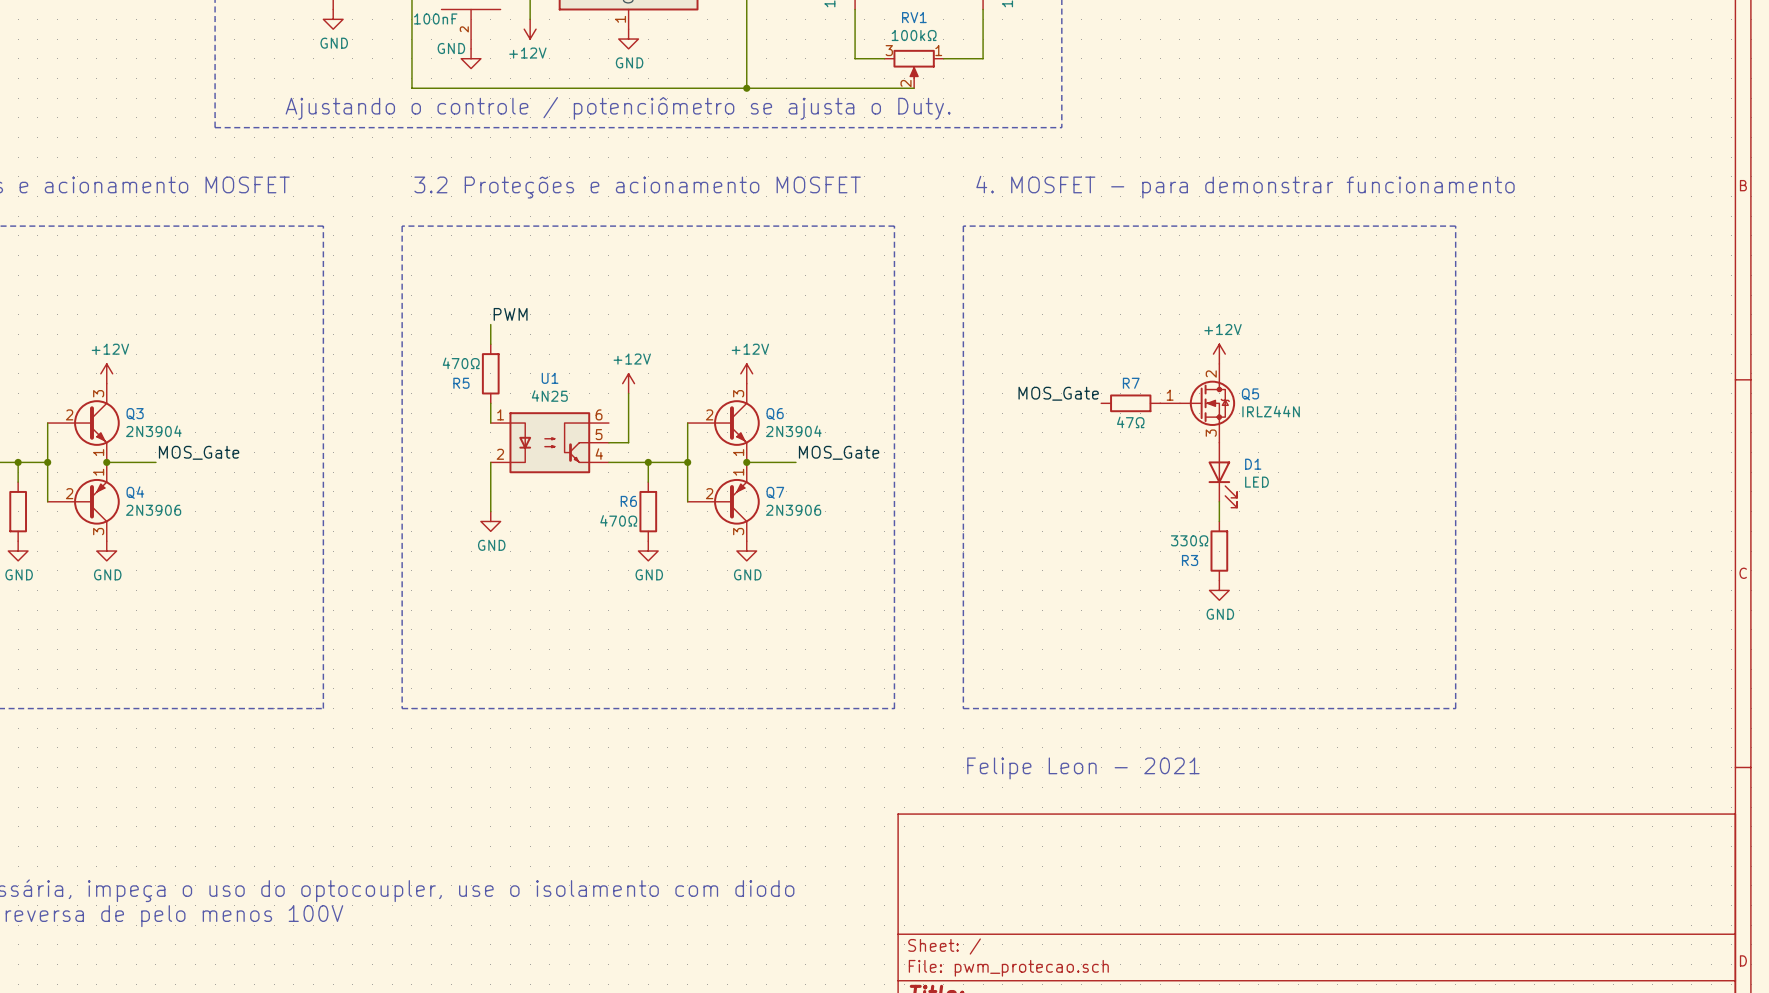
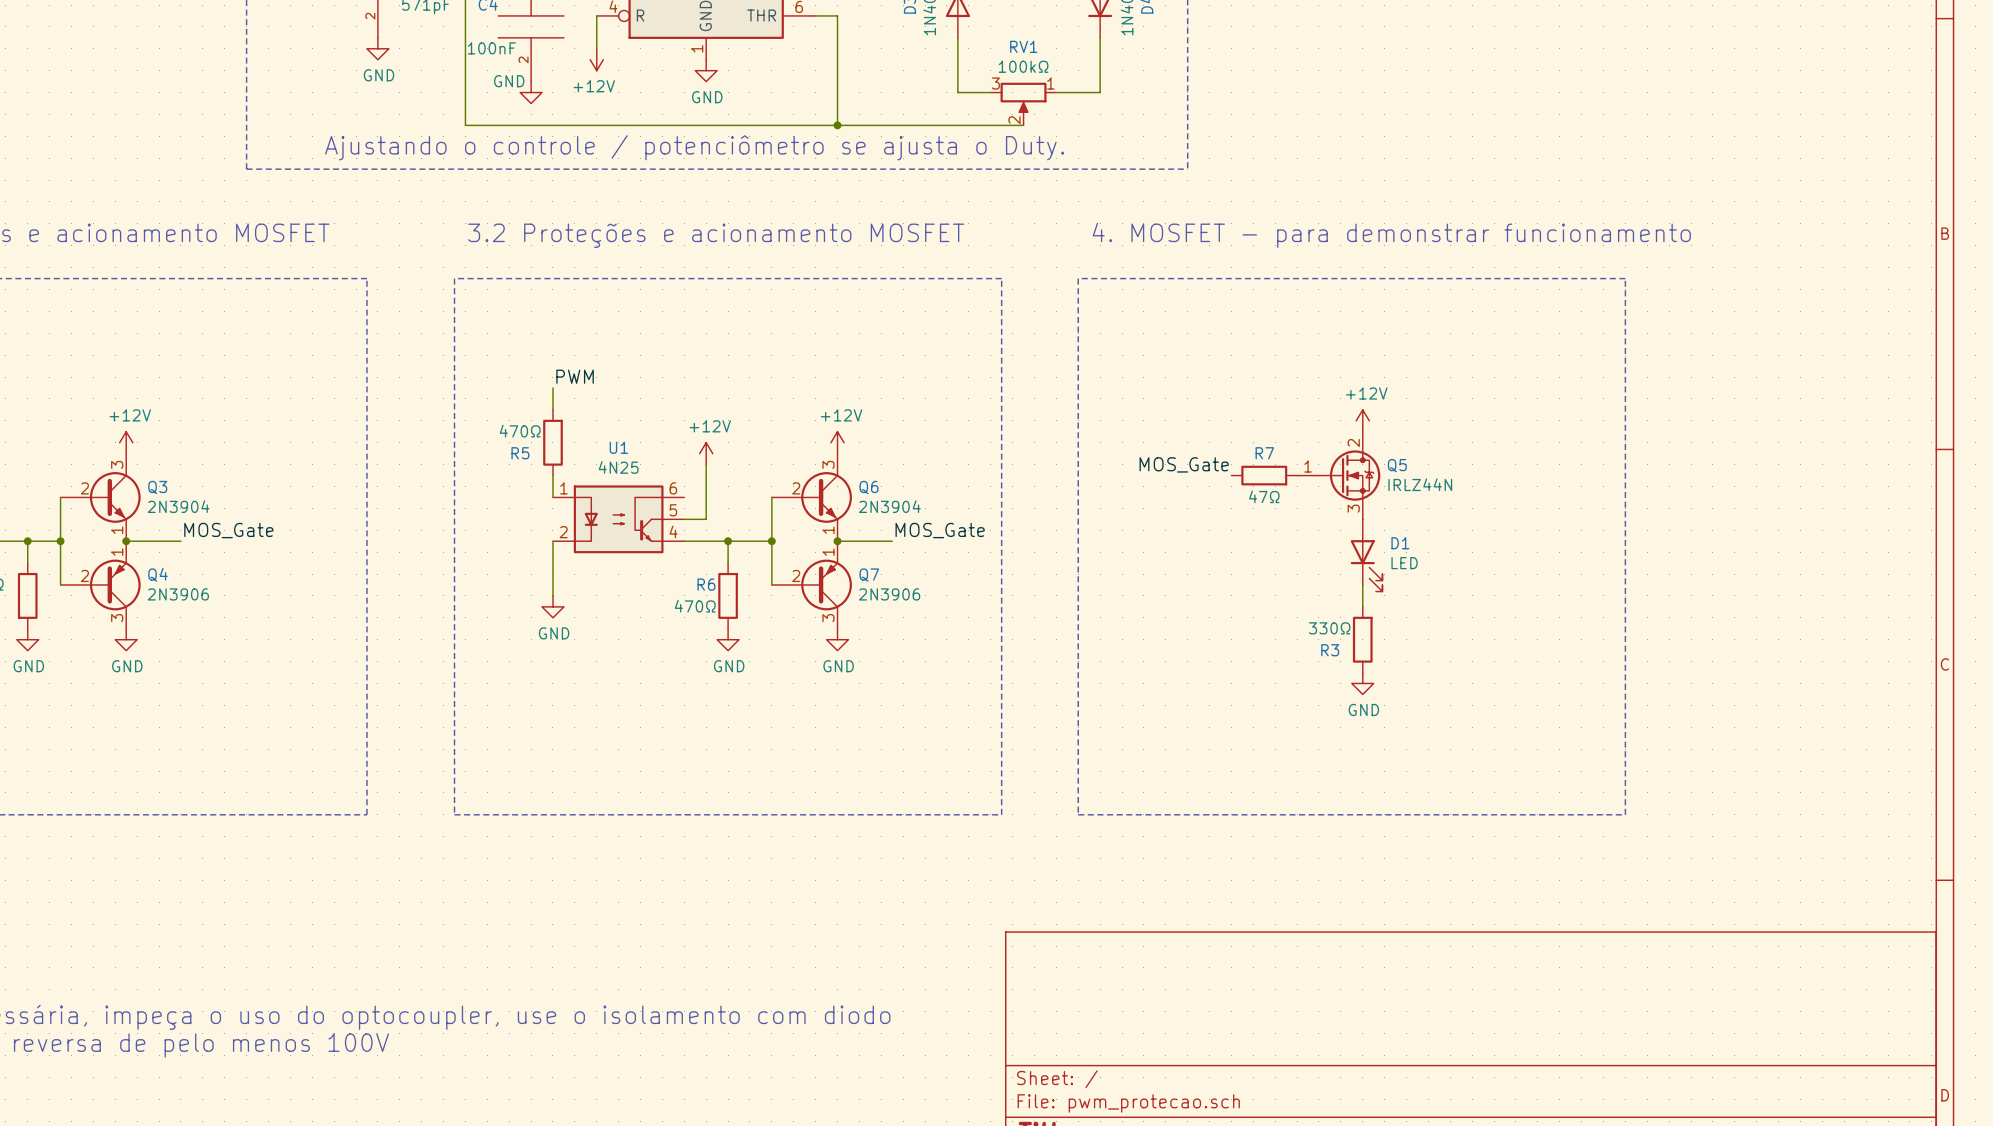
text: Felipe Leon - 2021 (1083, 768) -> none

